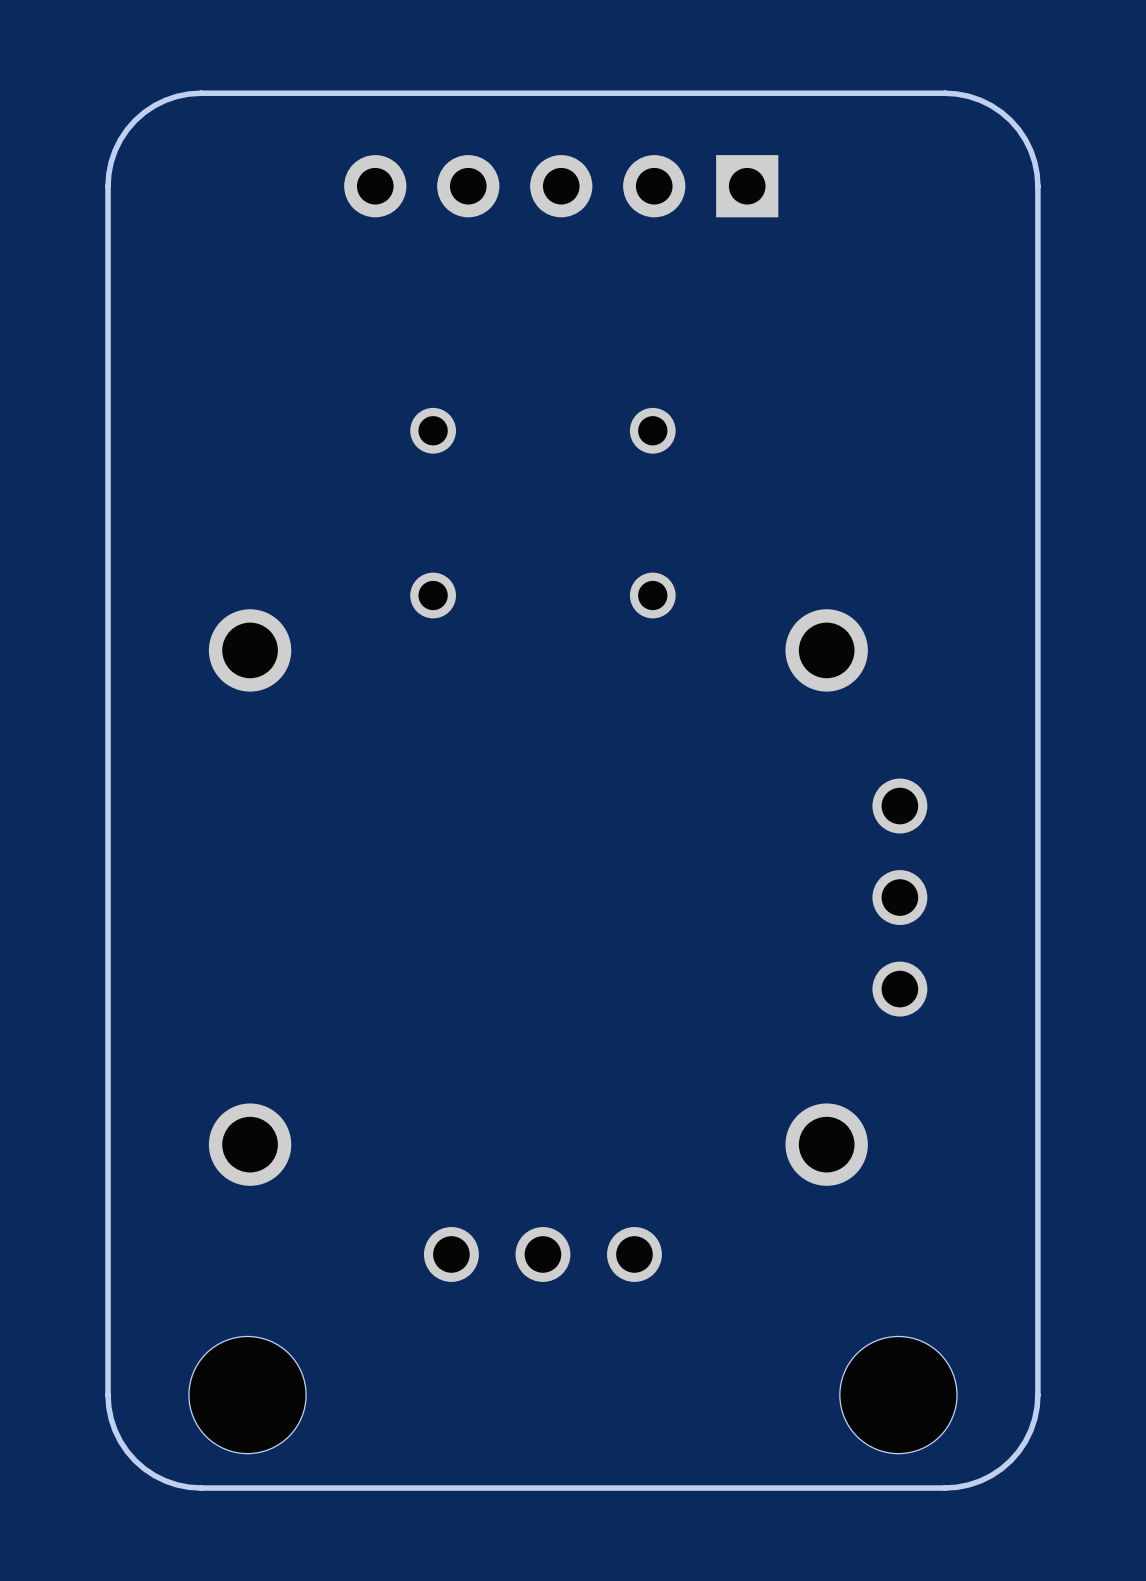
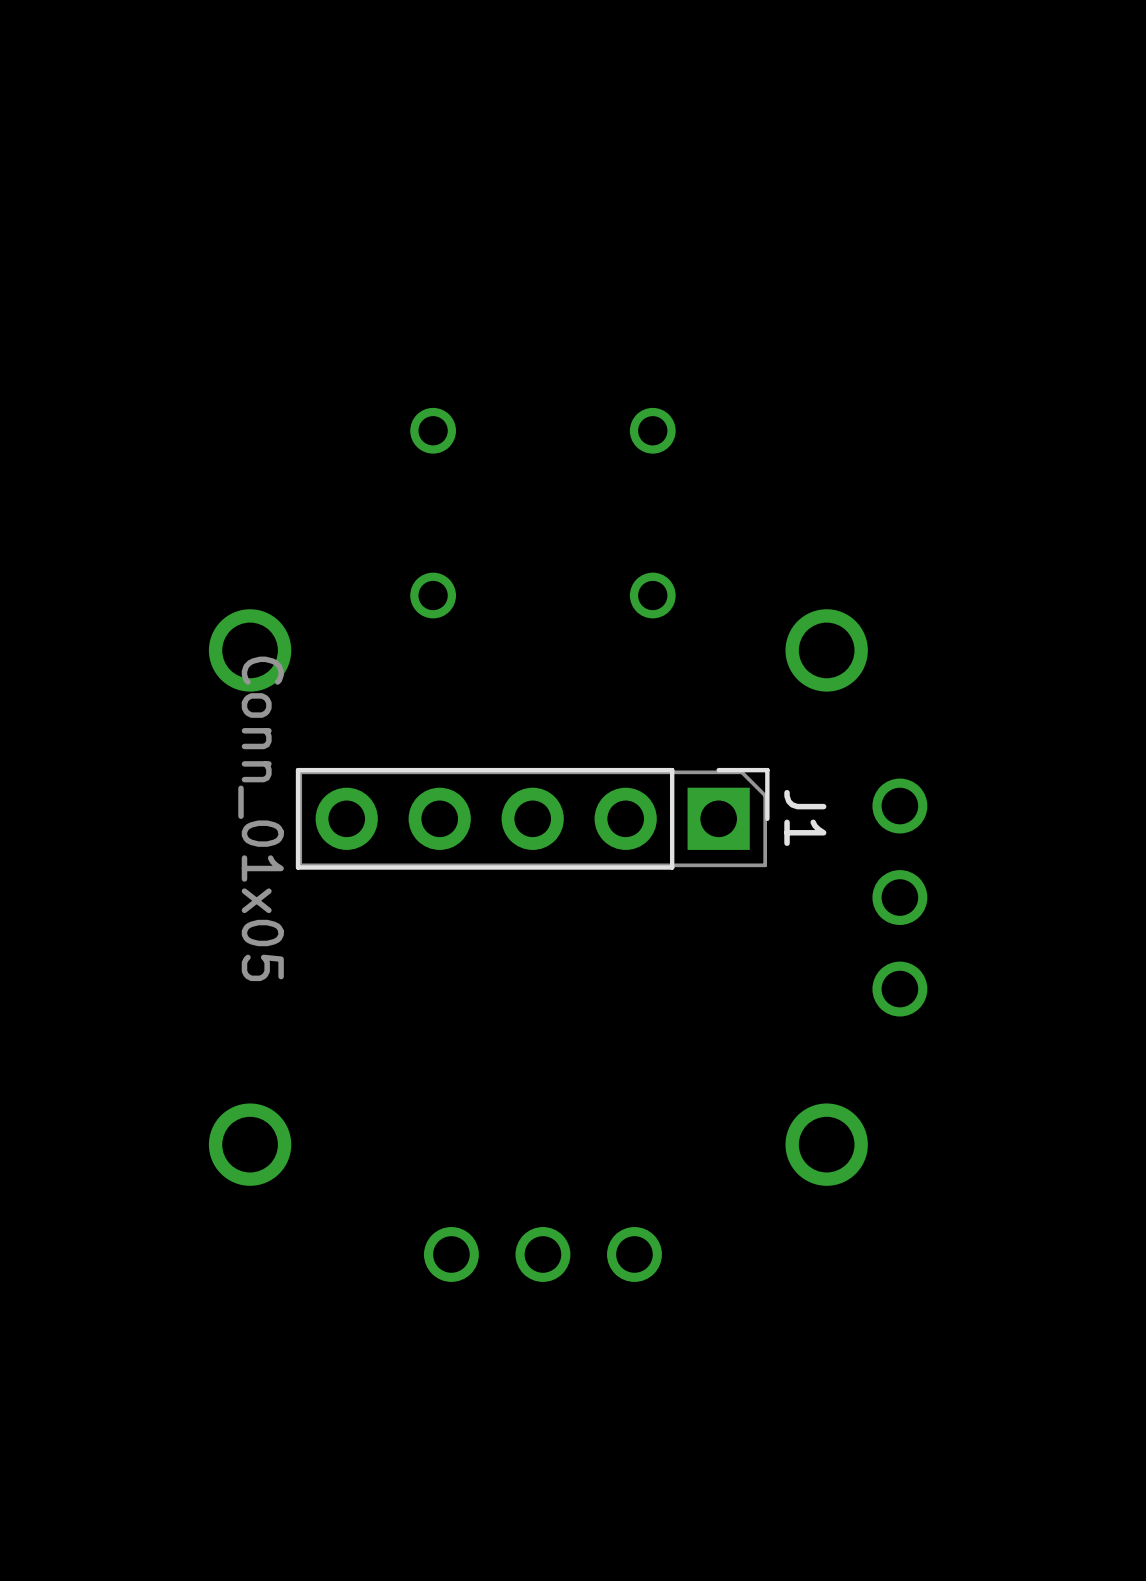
board edge: (944, 93) (201, 93) (176, 96) (154, 105) (135, 120) (120, 139) (111, 162) (108, 186) (108, 1395) (111, 1419) (120, 1441) (135, 1460) (154, 1475) (176, 1484) (201, 1488) (944, 1488) (968, 1484) (991, 1475) (1010, 1460) (1025, 1441) (1034, 1419) (1037, 1395) (1037, 186) (1034, 162) (1030, 150) (1018, 129) (1010, 120) (991, 105) (980, 100) (968, 96) (944, 93) -> none
J1 side: top (561, 186) -> bottom (532, 818)
part: (247, 1395) -> none
part: (898, 1395) -> none

